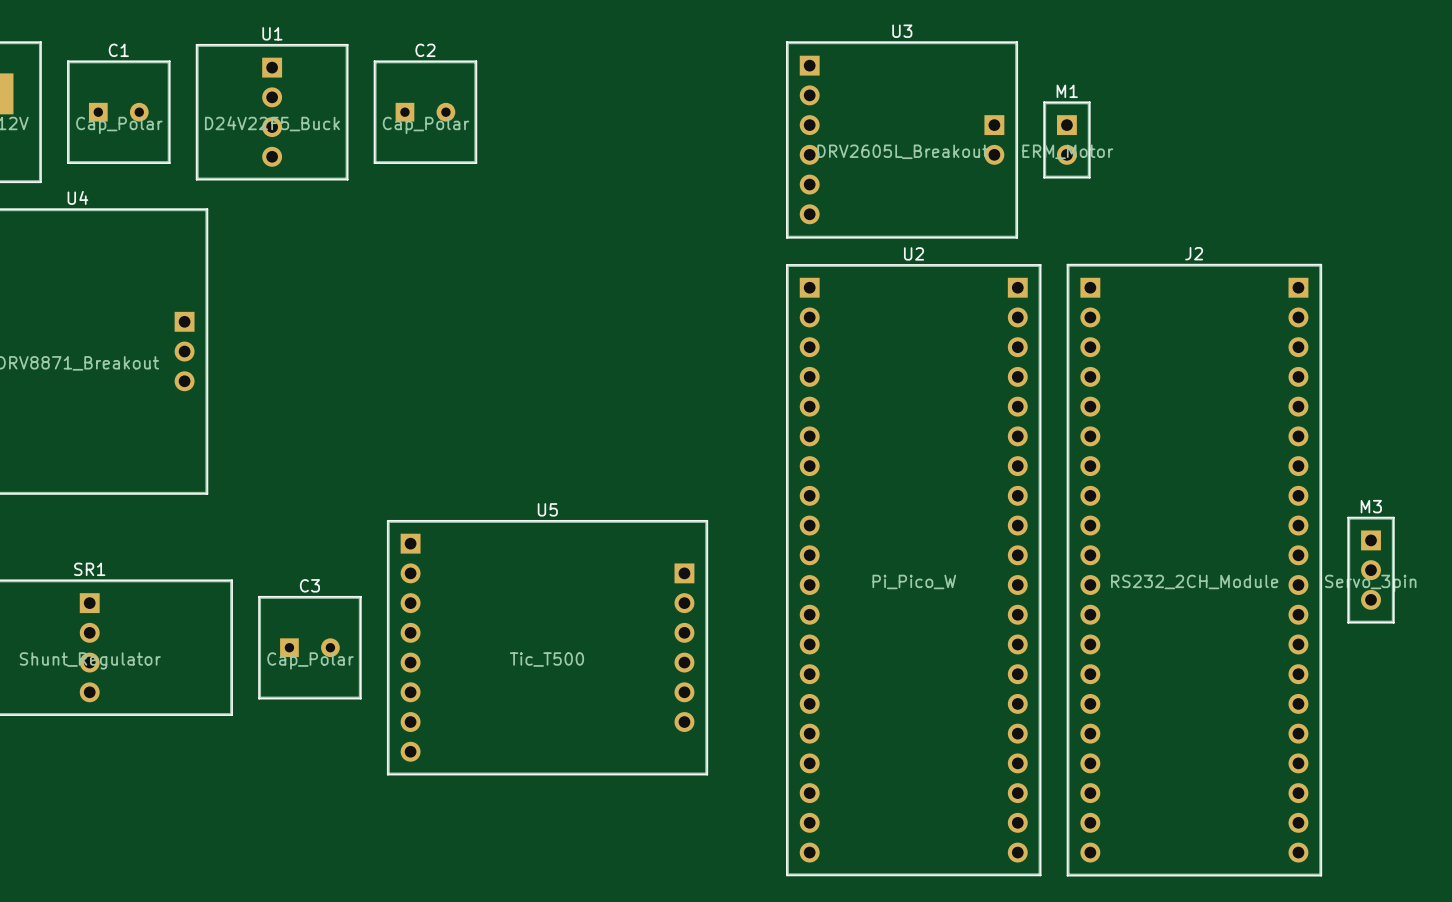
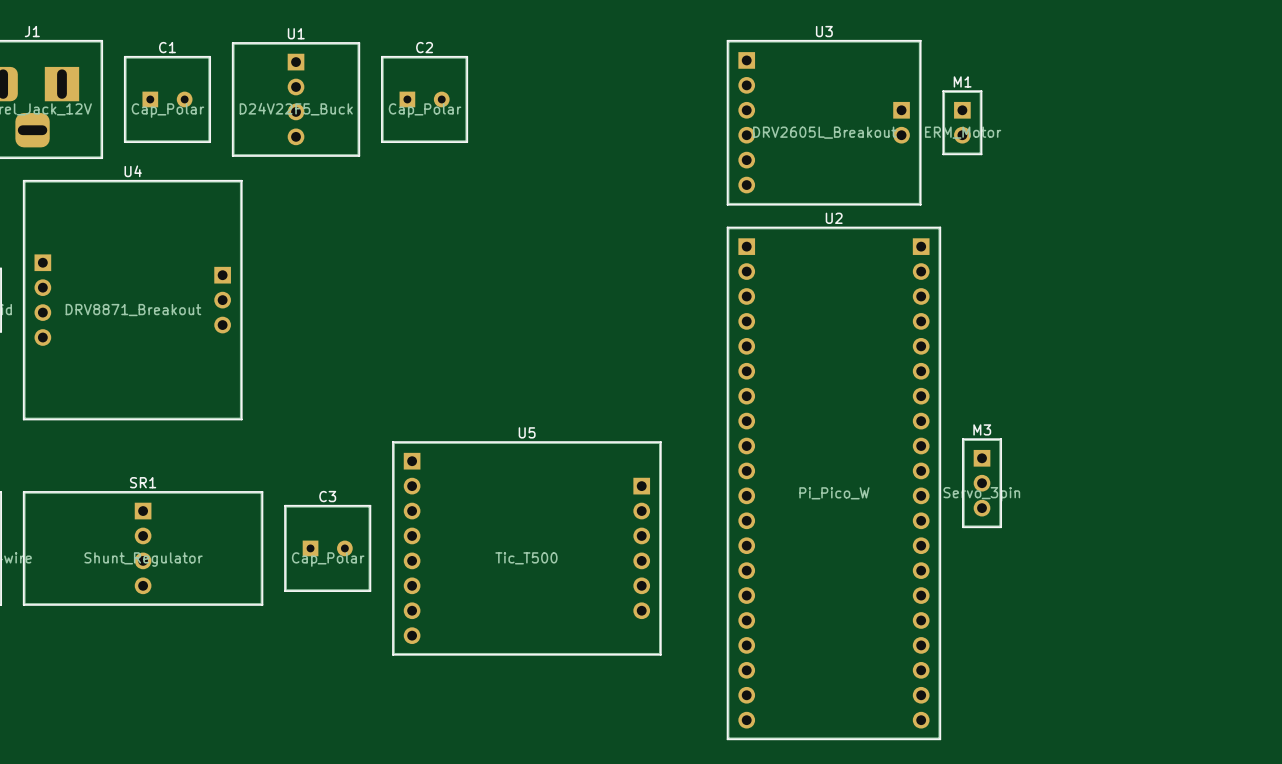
J2: RS232_2CH_Module (1194, 570) -> none
M3 position: (1371, 570) -> (982, 483)

